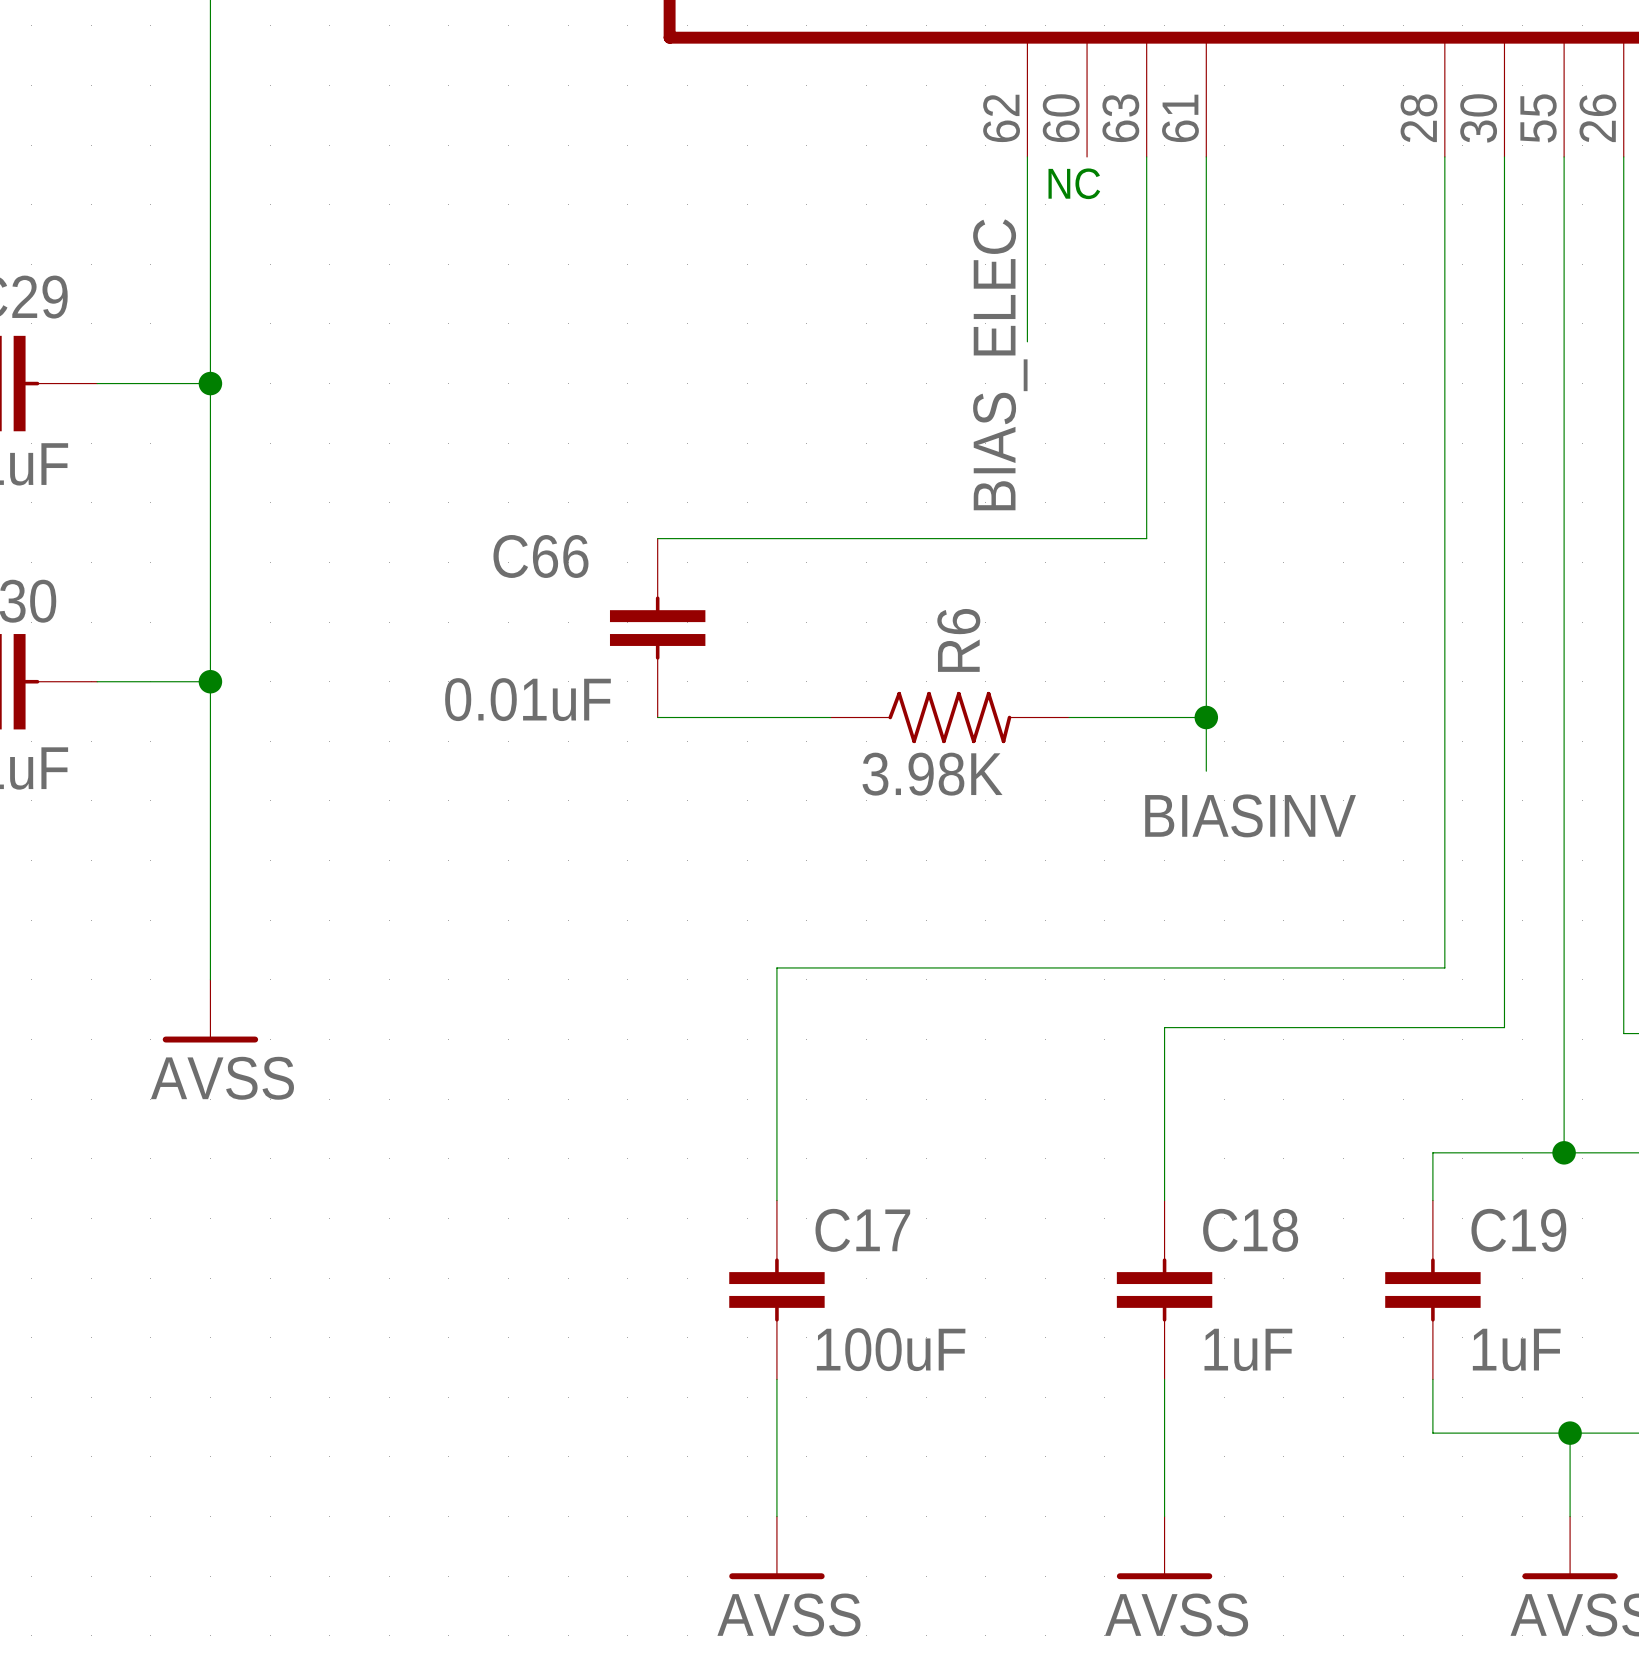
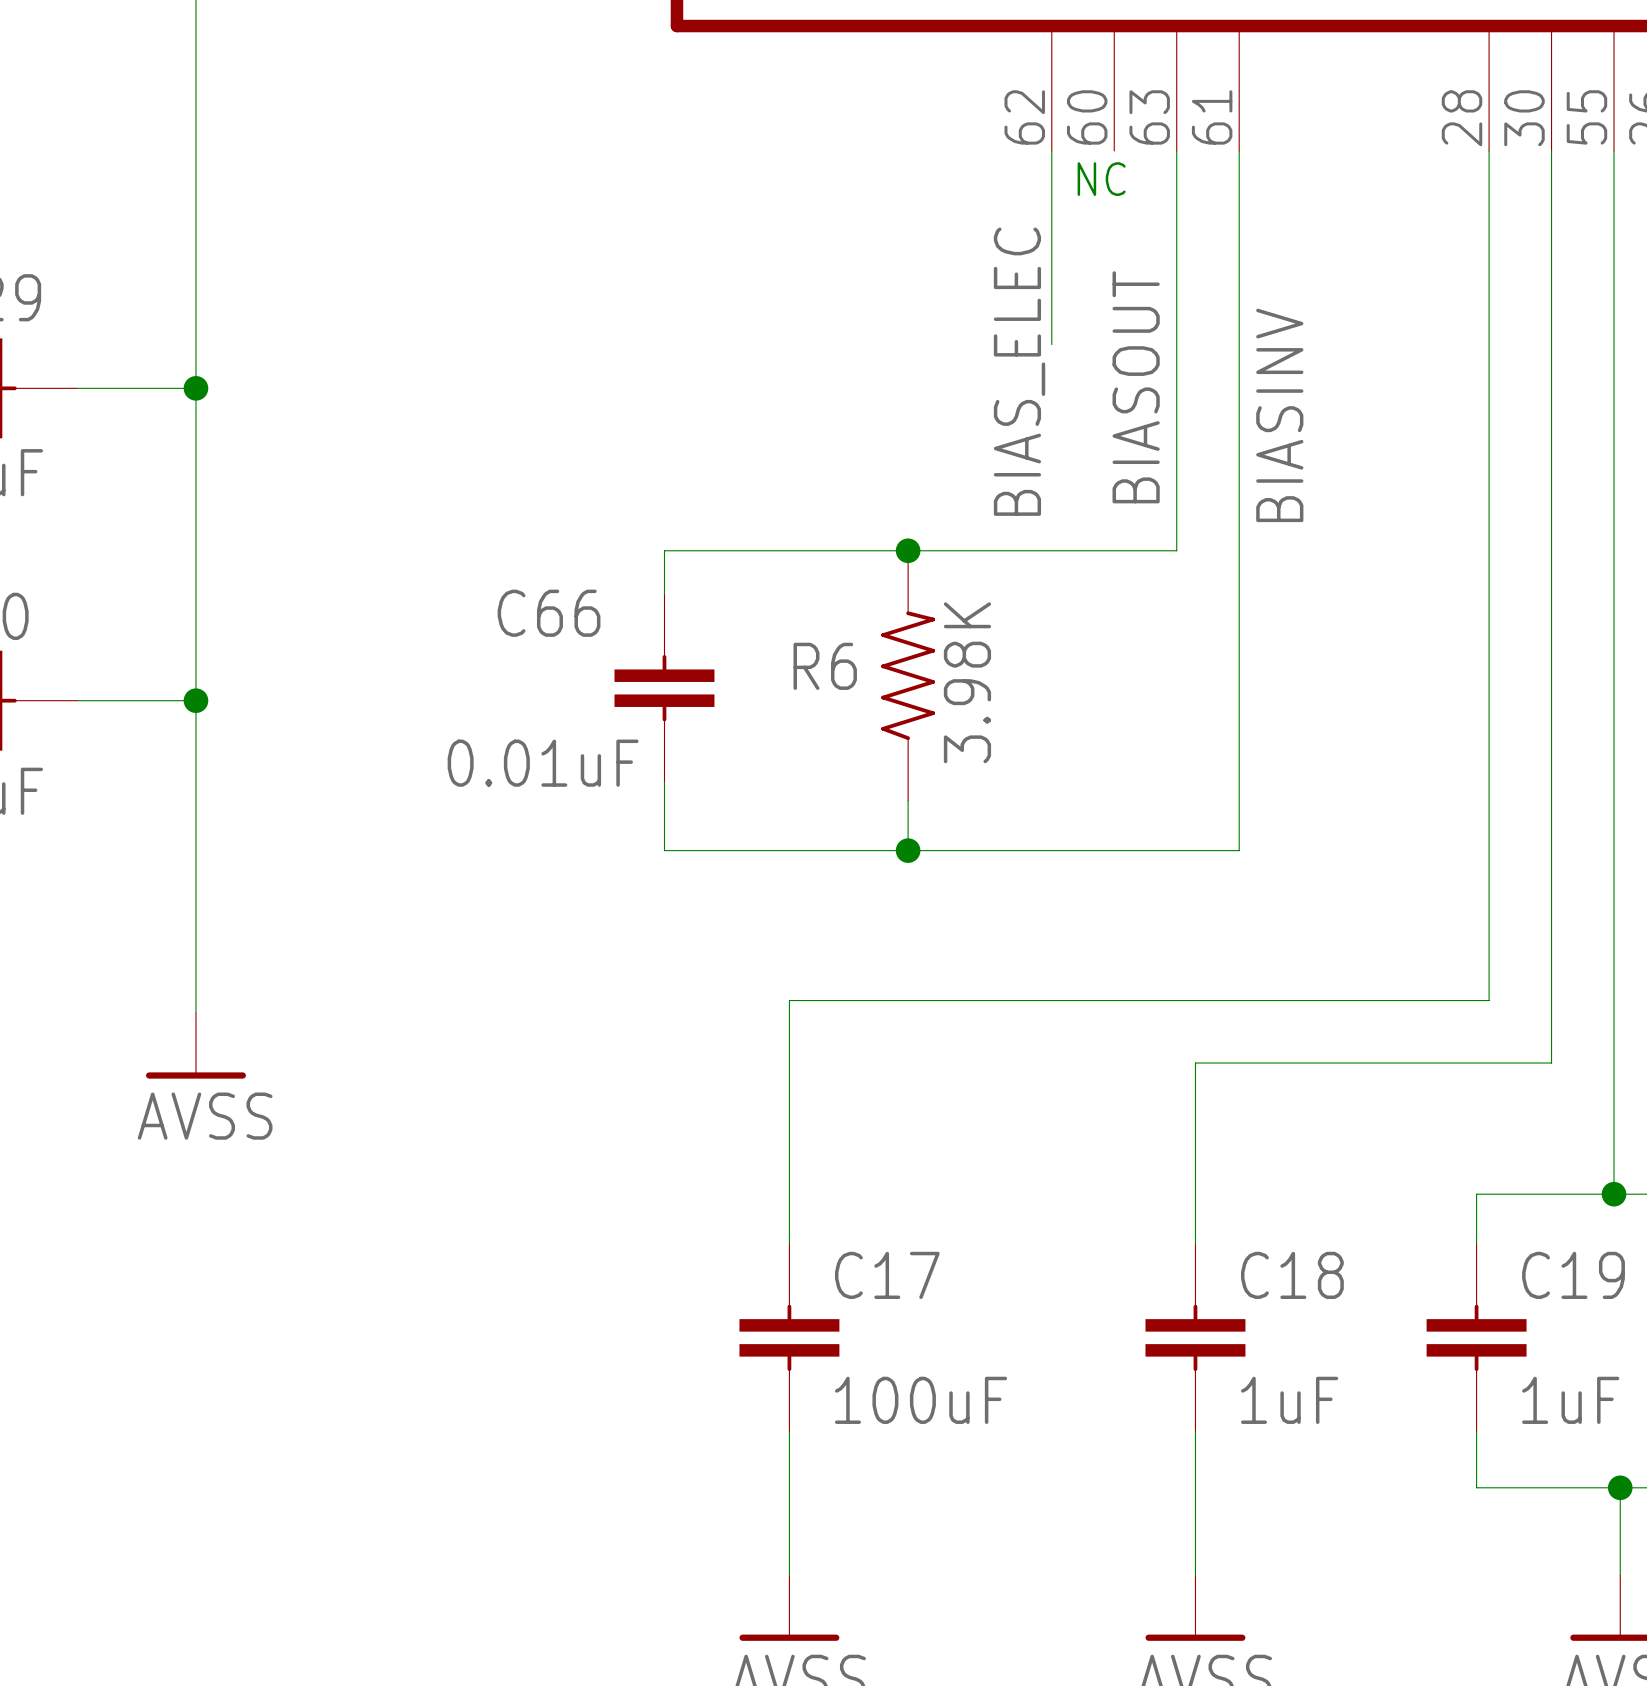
label: none -> BIASOUT (1136, 387)
junction: none -> (908, 550)
C66 position: (657, 628) -> (664, 688)
wire: (657, 717) (830, 717) -> none
R6 rotation: 0° (949, 717) -> 90° counterclockwise (908, 675)
wire: (1069, 717) (1206, 717) -> none
junction: (1206, 717) -> none
wire: none -> (664, 781) (664, 850) (1239, 850) (1239, 794)
wire: none -> (908, 800) (908, 850)
label rotation: 0° (1250, 815) -> 90° counterclockwise (1279, 415)
label position: BIASINV (1250, 815) -> BIASINV (1279, 415)
junction: none -> (908, 850)

